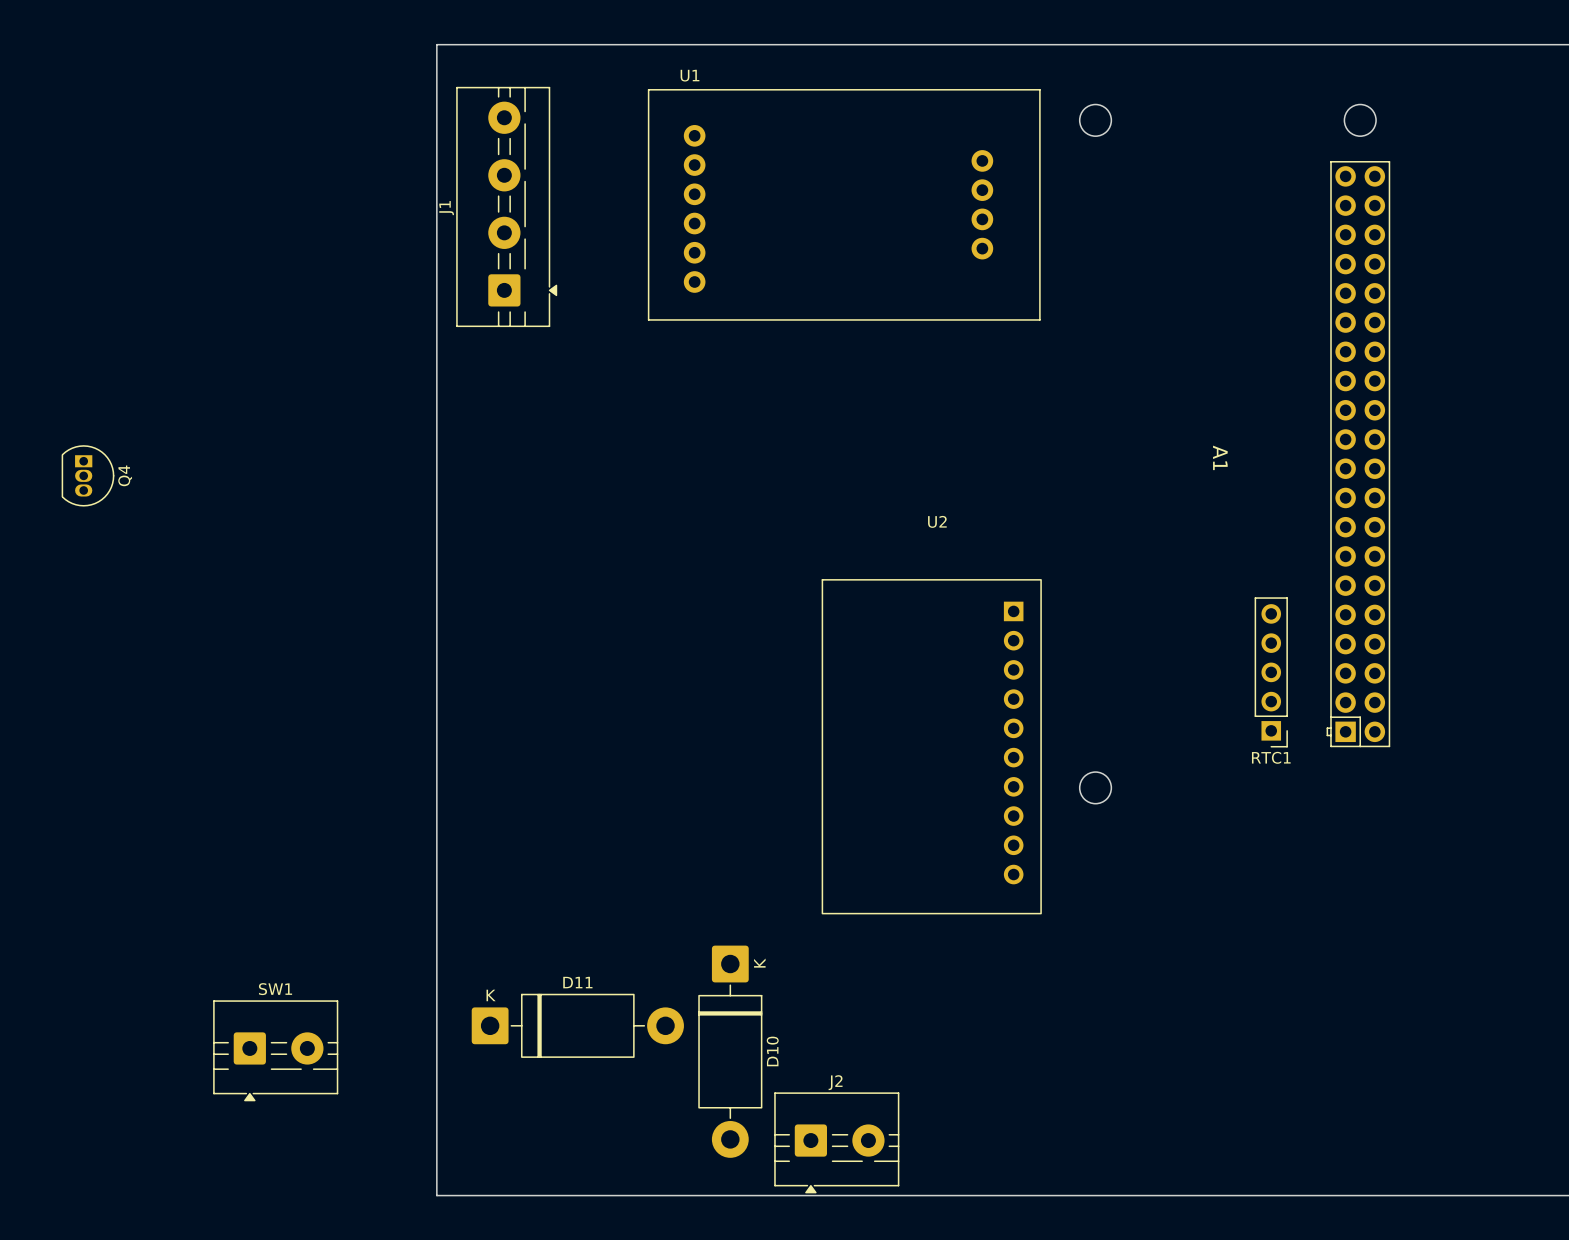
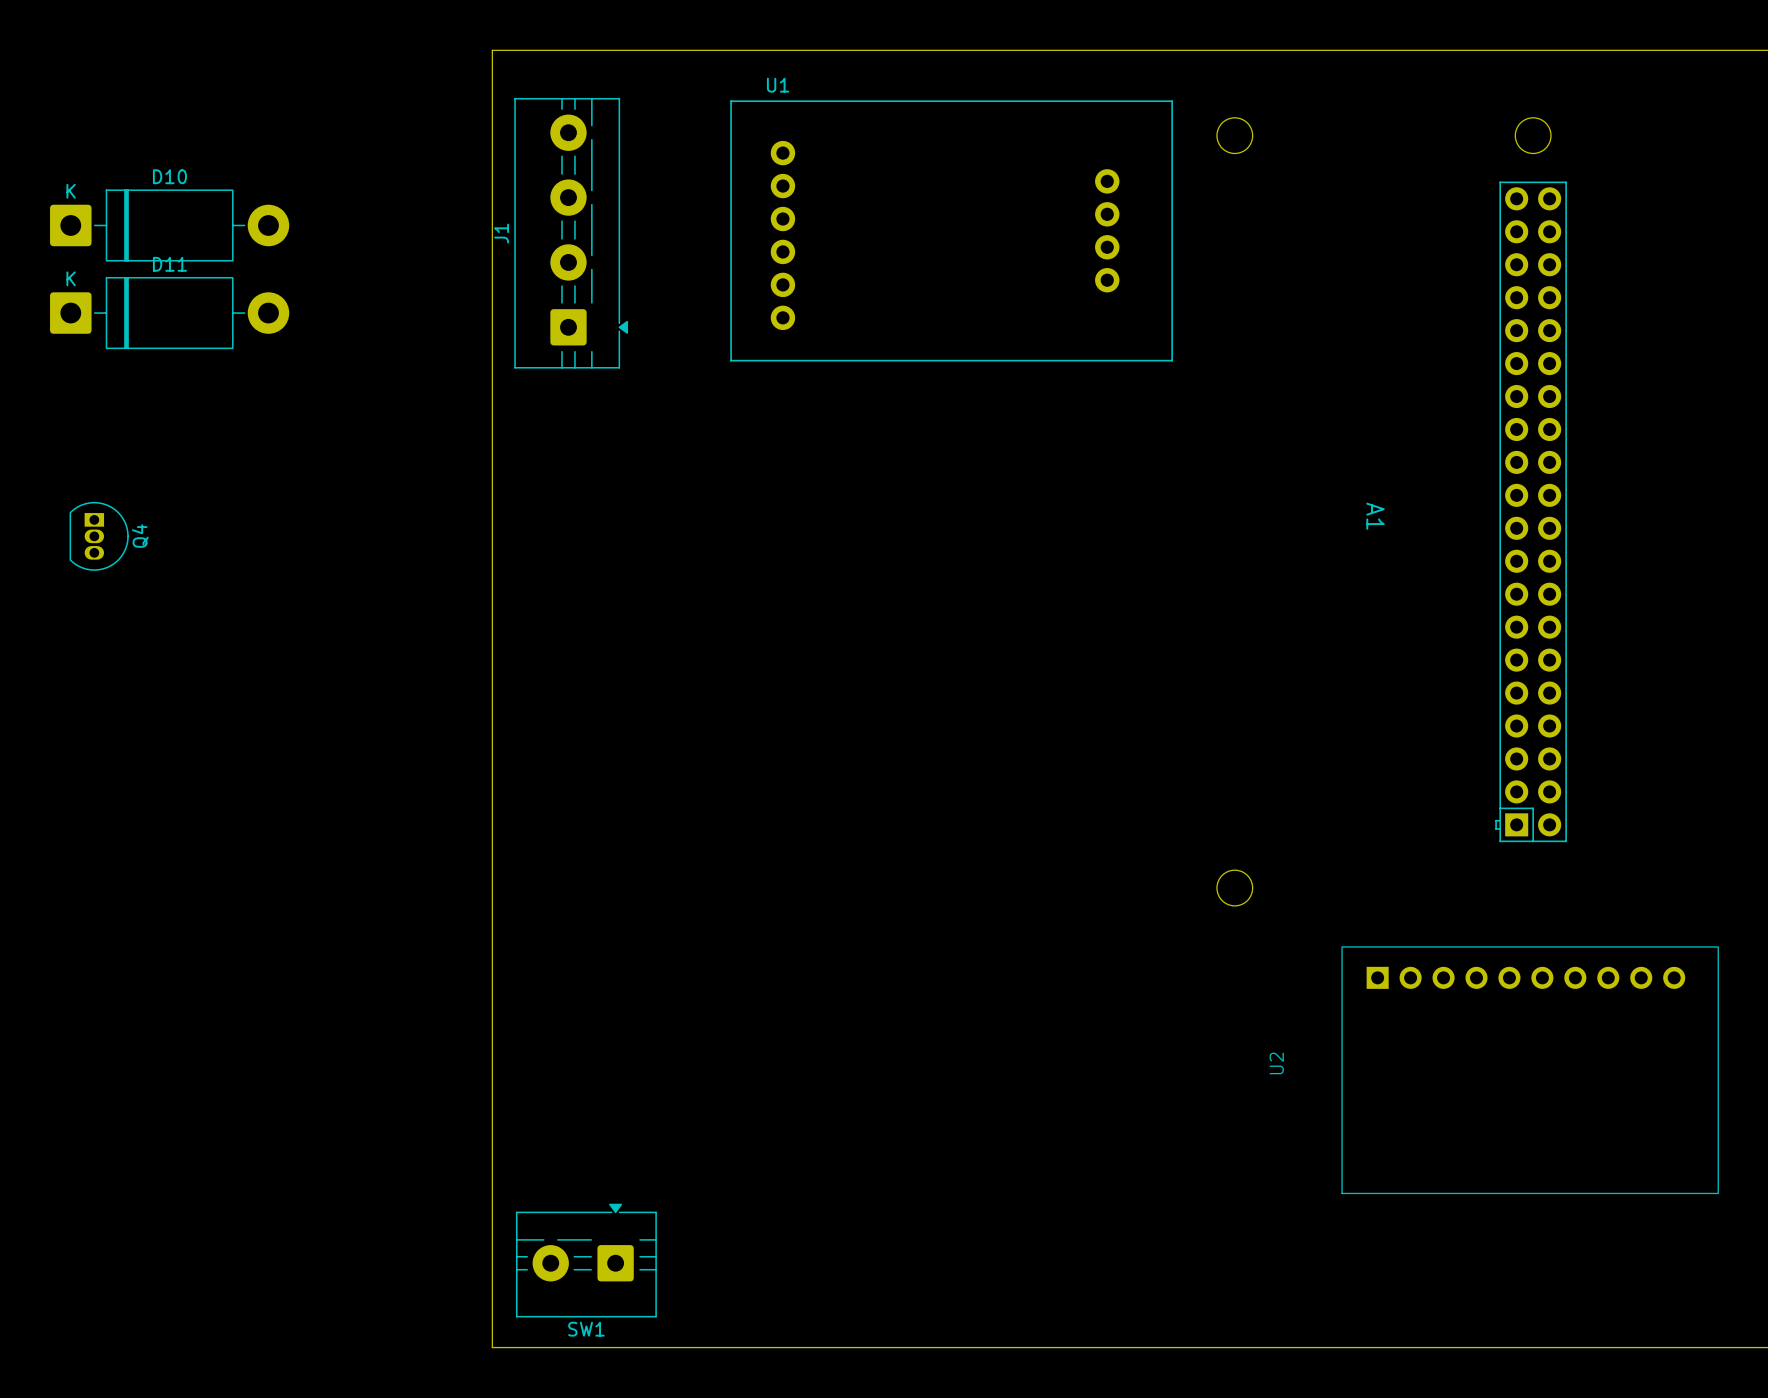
RTC1: (1271, 672) -> none
U2 rotation: 0° (931, 746) -> 90° counterclockwise (1530, 1070)
U2 position: (931, 746) -> (1530, 1070)
D11 position: (577, 1025) -> (169, 313)
SW1 rotation: 0° (275, 1050) -> 180° (586, 1260)
SW1 position: (275, 1050) -> (586, 1260)
D10 rotation: 0° (730, 1051) -> 90° counterclockwise (169, 225)
D10 position: (730, 1051) -> (169, 225)
J2: (836, 1142) -> none

